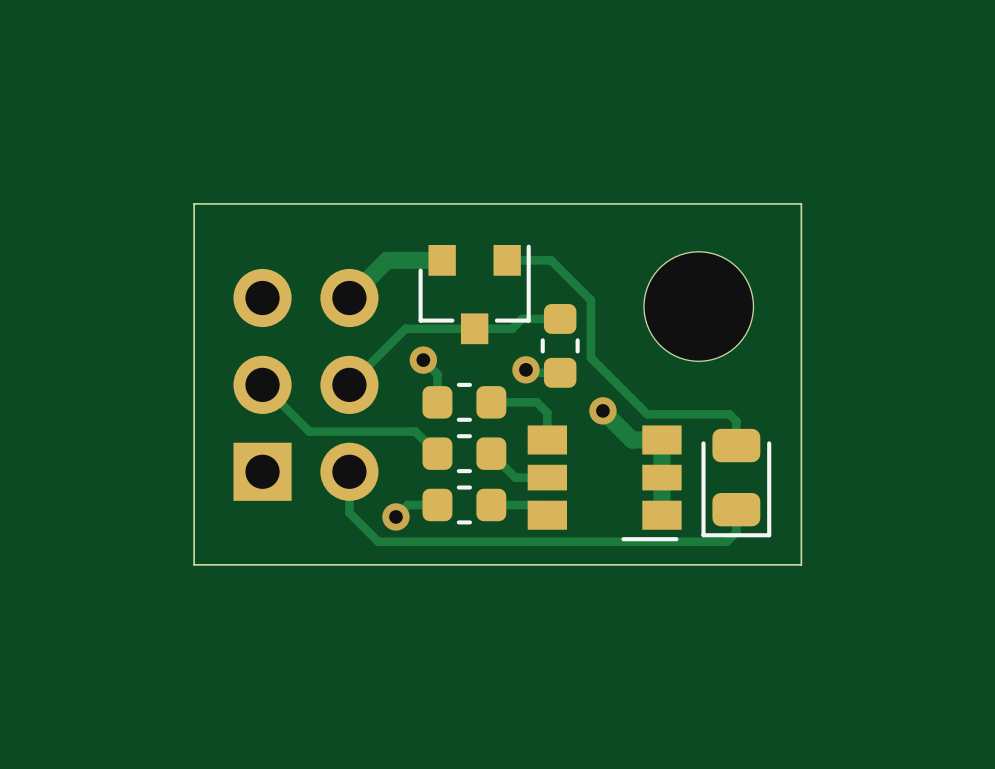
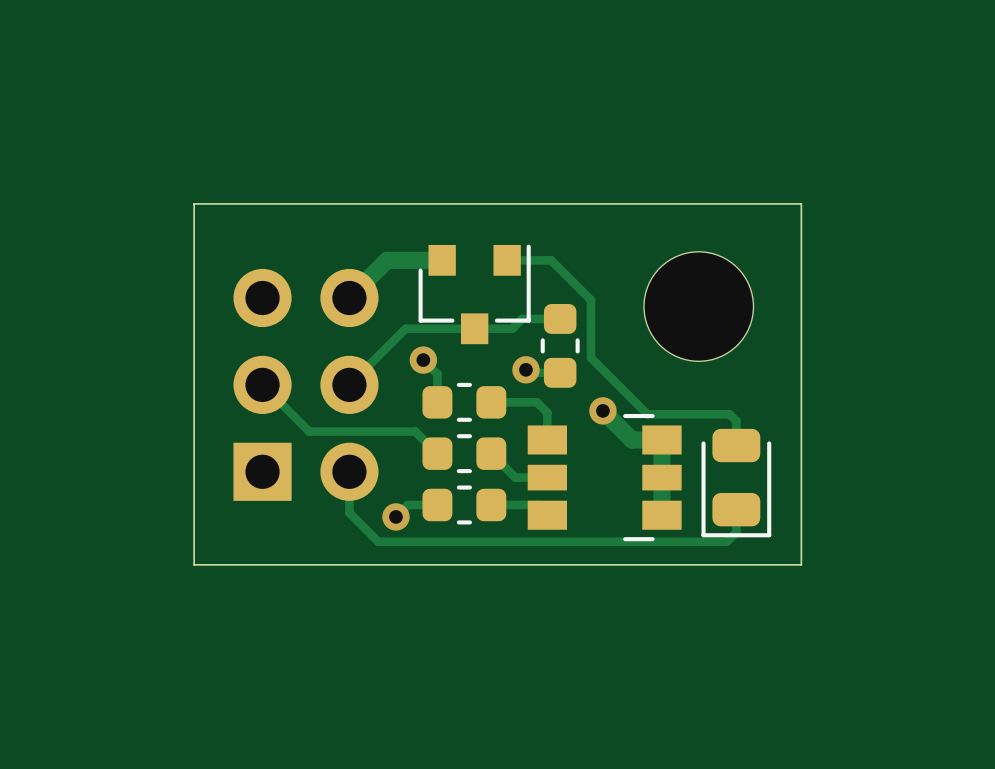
part footprint: [527, 425, 682, 542] -> [527, 413, 682, 542]

